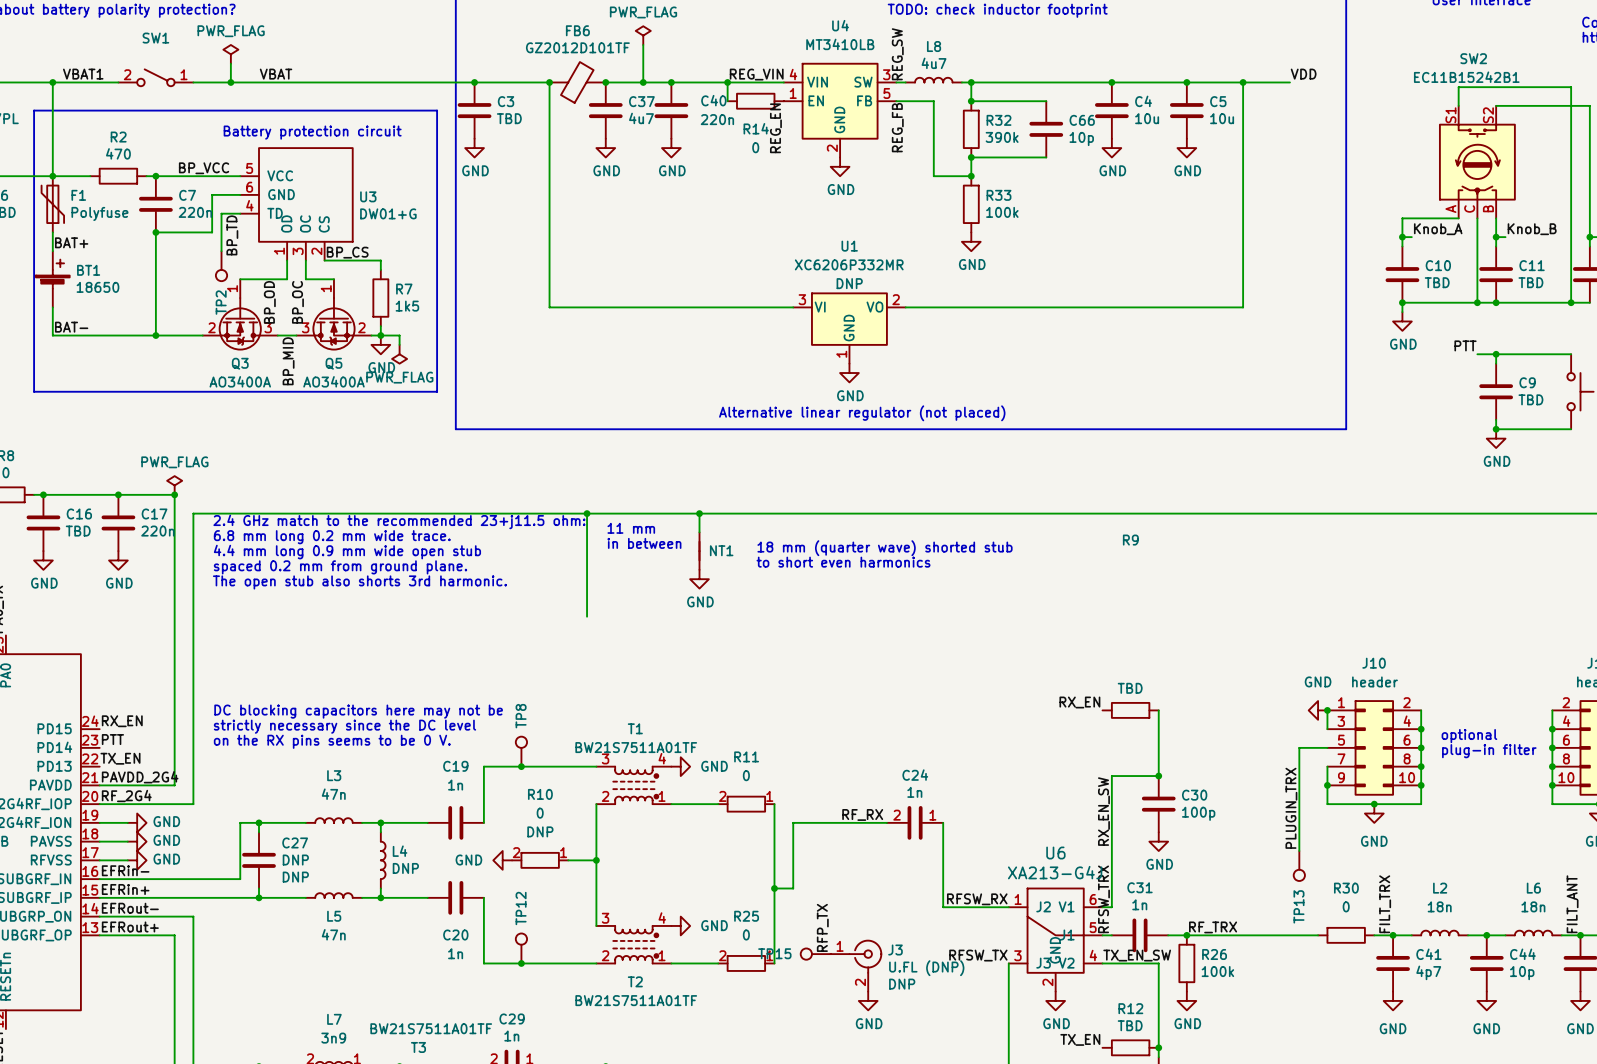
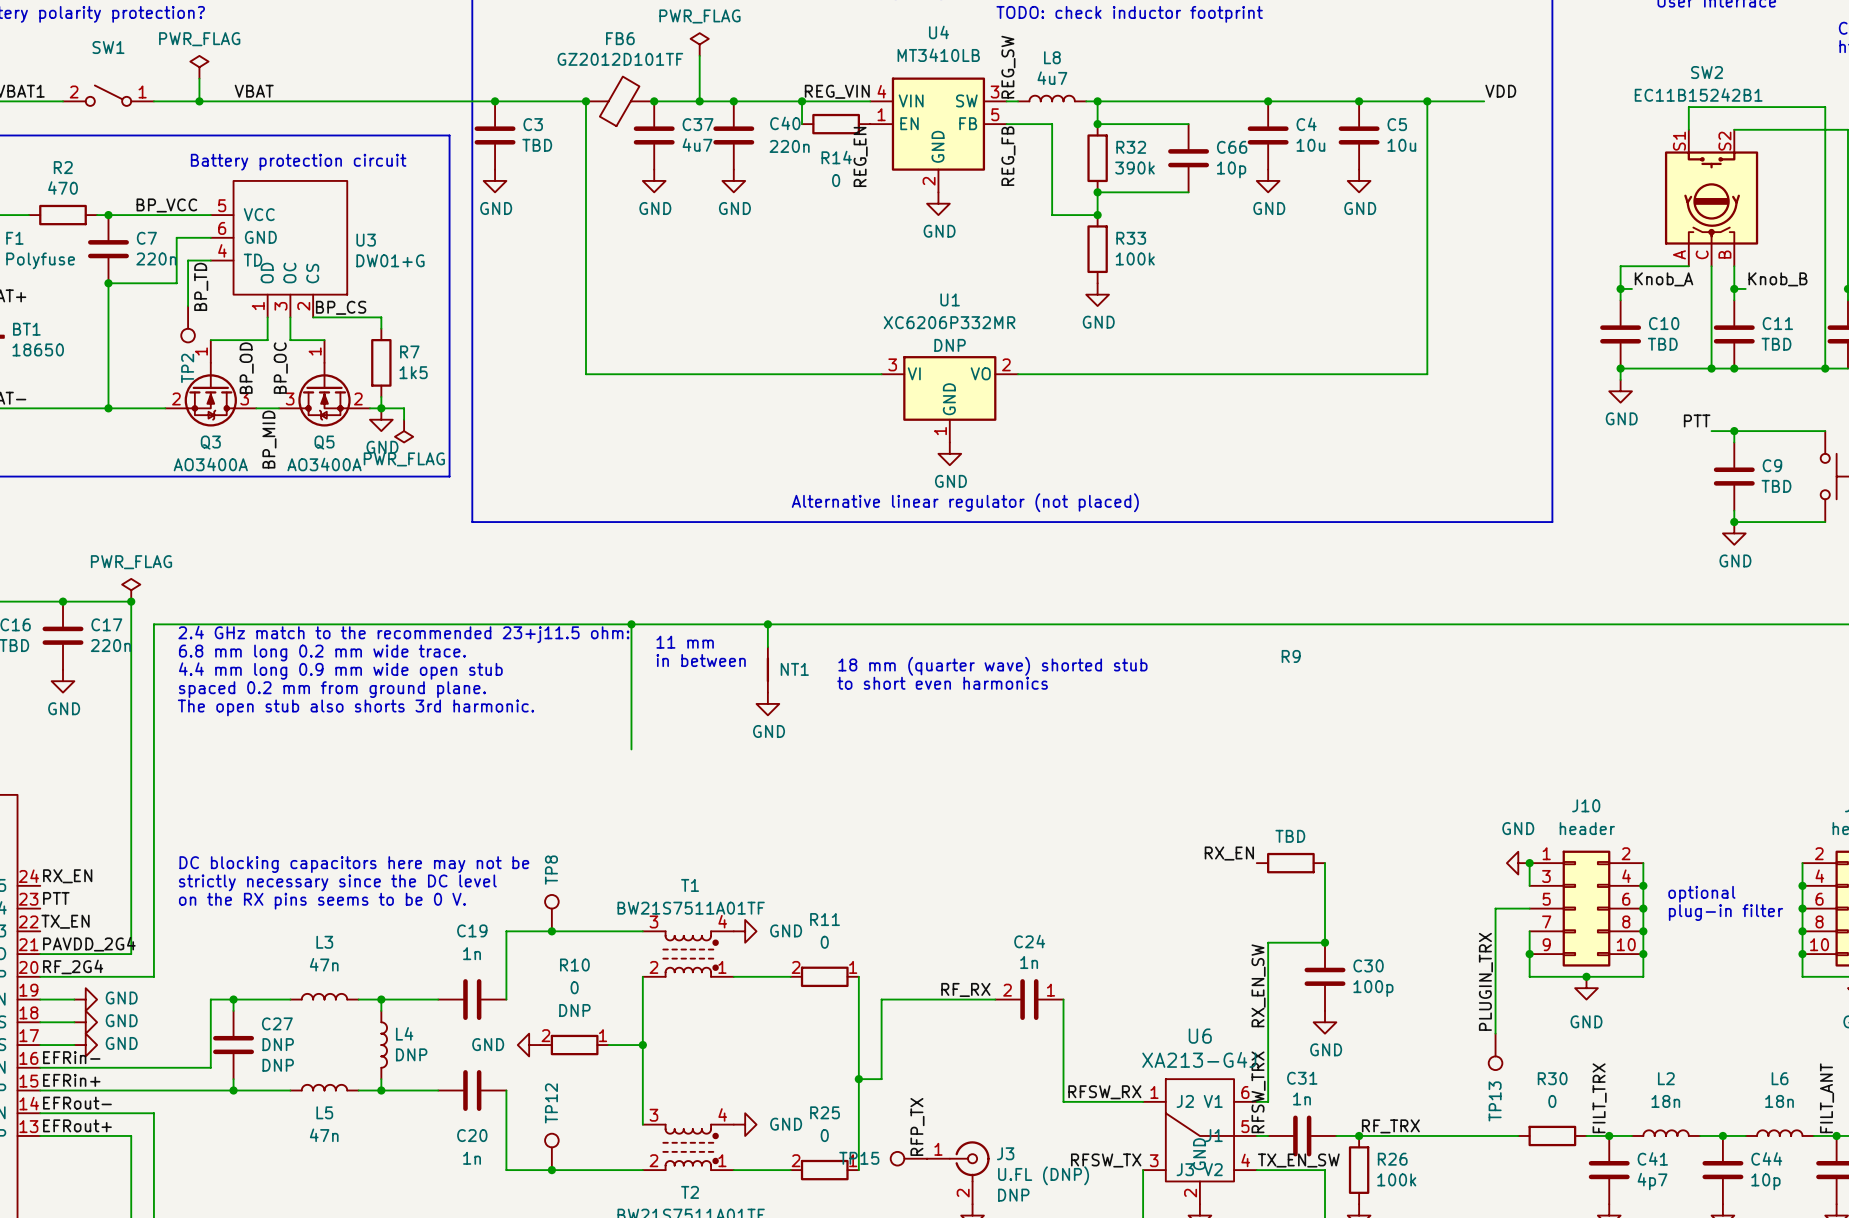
SW2 symbol: [1438, 105, 1516, 219] -> [1664, 129, 1759, 267]

